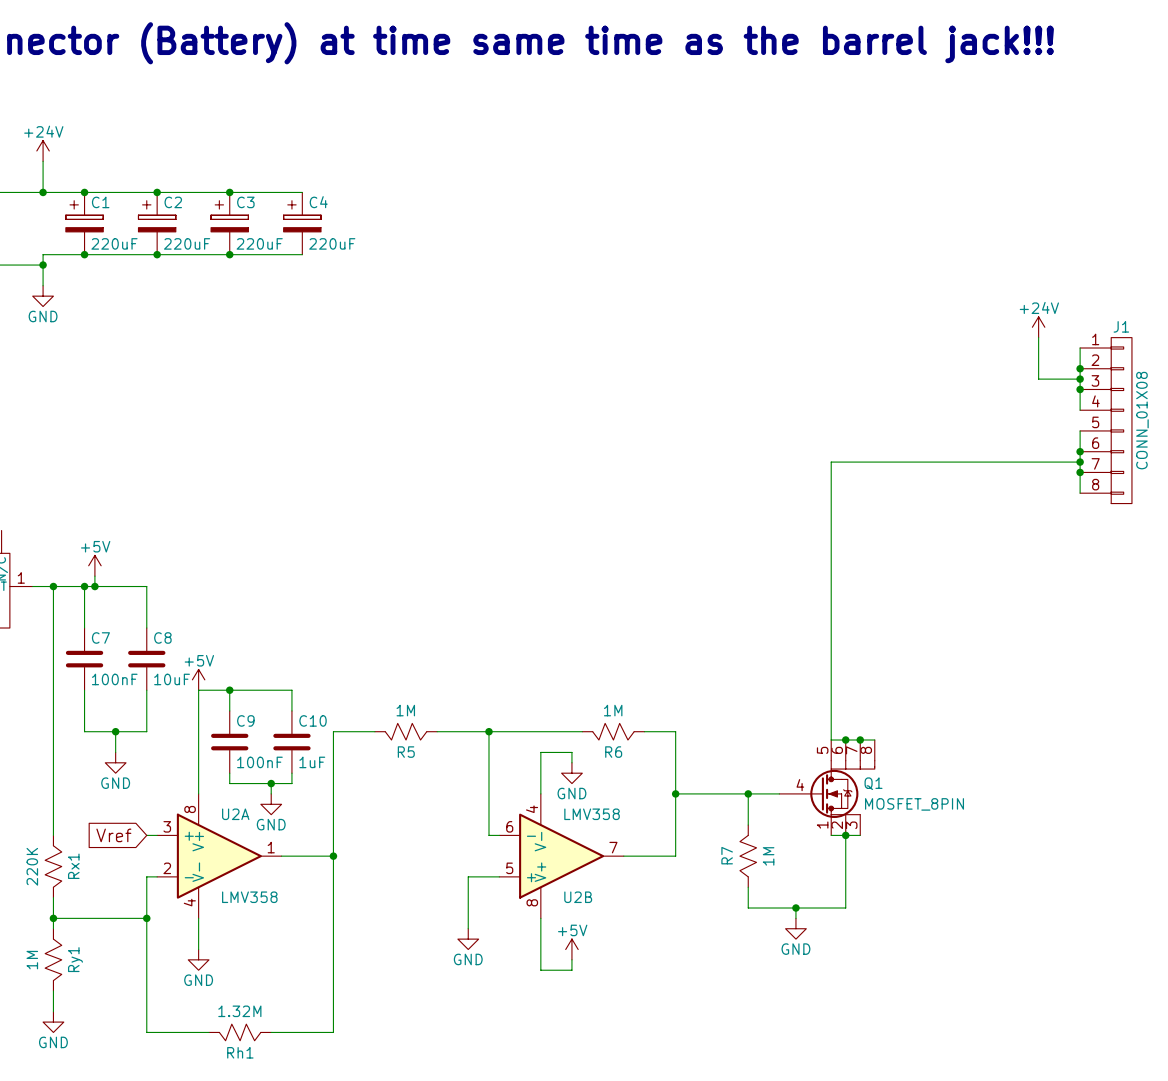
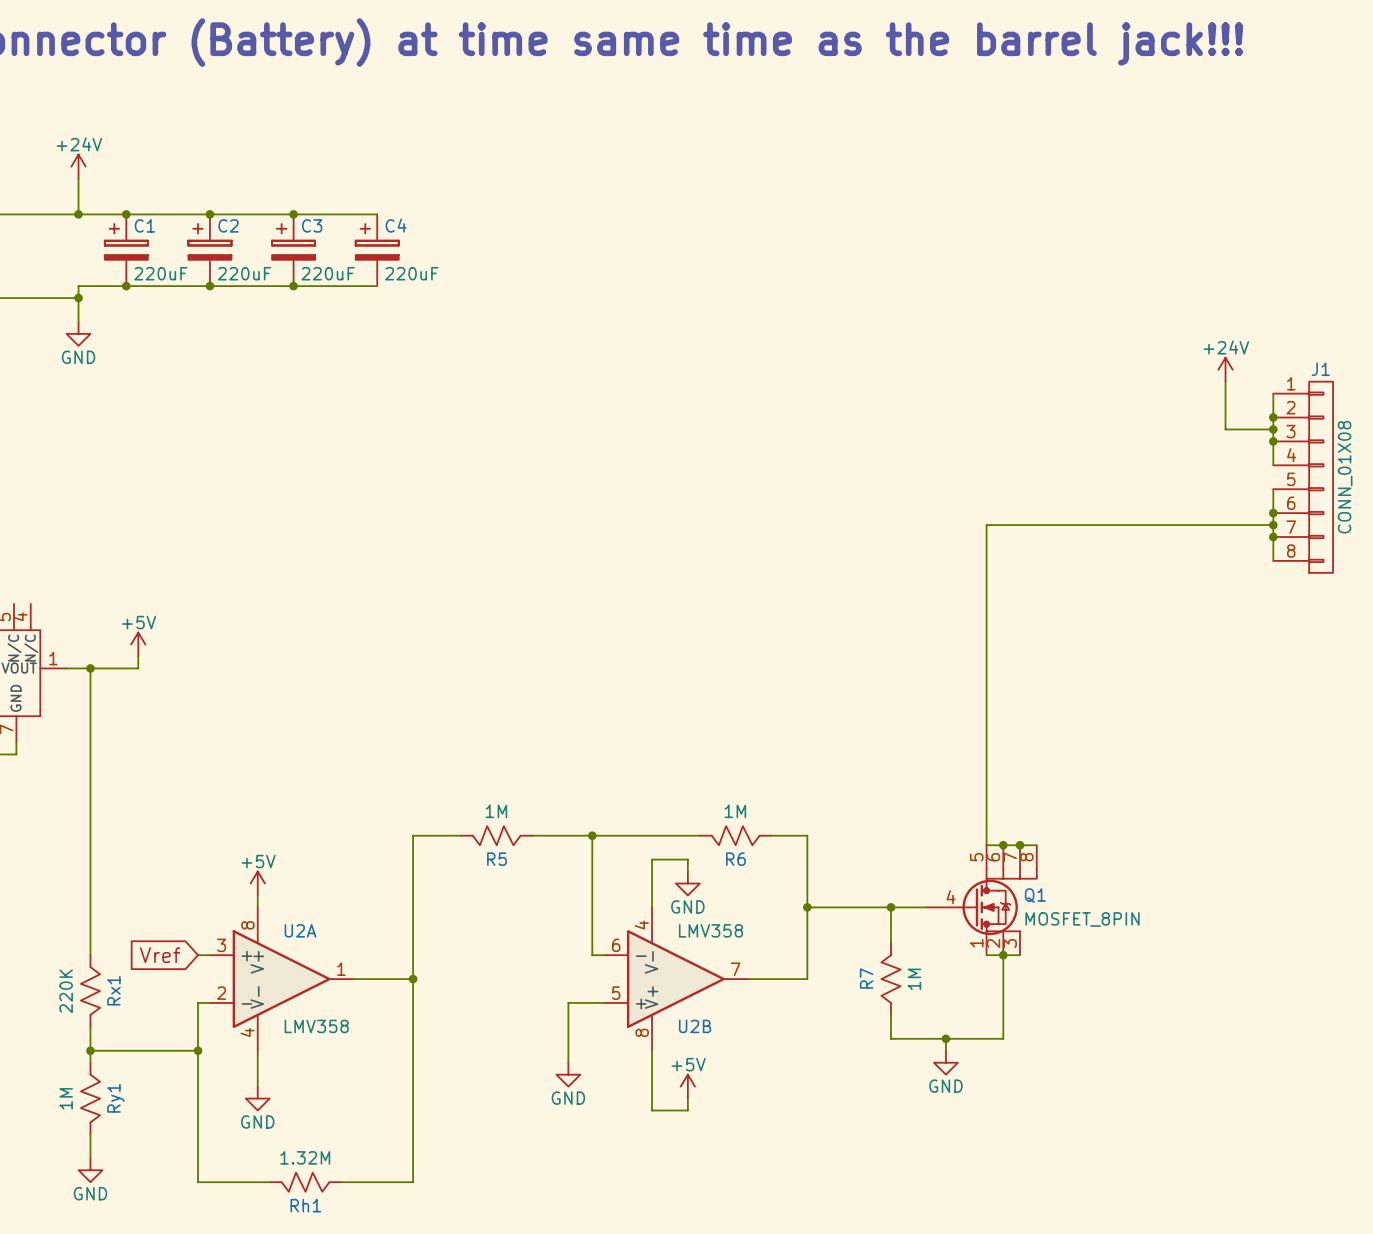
wire: (84, 586) (84, 628) -> none
junction: (84, 586) -> none
wire: (94, 586) (146, 586) (146, 628) -> none
junction: (94, 586) -> none
C7: 100nF (84, 659) -> none
C8: 10uF (146, 659) -> none
power symbol position: +5V (198, 679) -> +5V (257, 883)
wire: (84, 690) (84, 731) (146, 731) (146, 690) -> none
wire: (229, 690) (229, 710) -> none
junction: (229, 690) -> none
wire: (291, 710) (291, 690) (198, 690) (198, 783) -> none
wire: (115, 731) (115, 752) -> none
junction: (115, 731) -> none
C9: 100nF (229, 742) -> none
C10: 1uF (291, 742) -> none
power symbol: GND (115, 762) -> none
wire: (229, 773) (229, 783) (291, 783) (291, 773) -> none
wire: (271, 783) (271, 793) -> none
junction: (271, 783) -> none
power symbol: GND (271, 804) -> none

